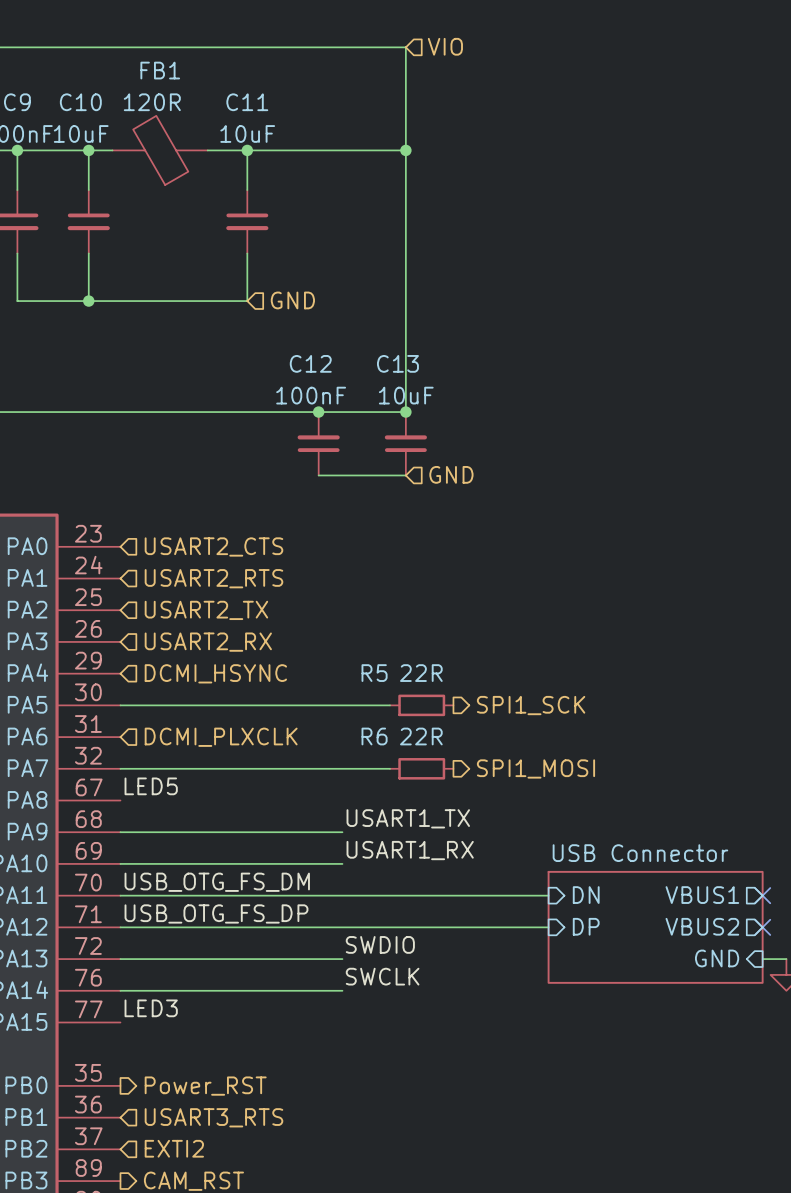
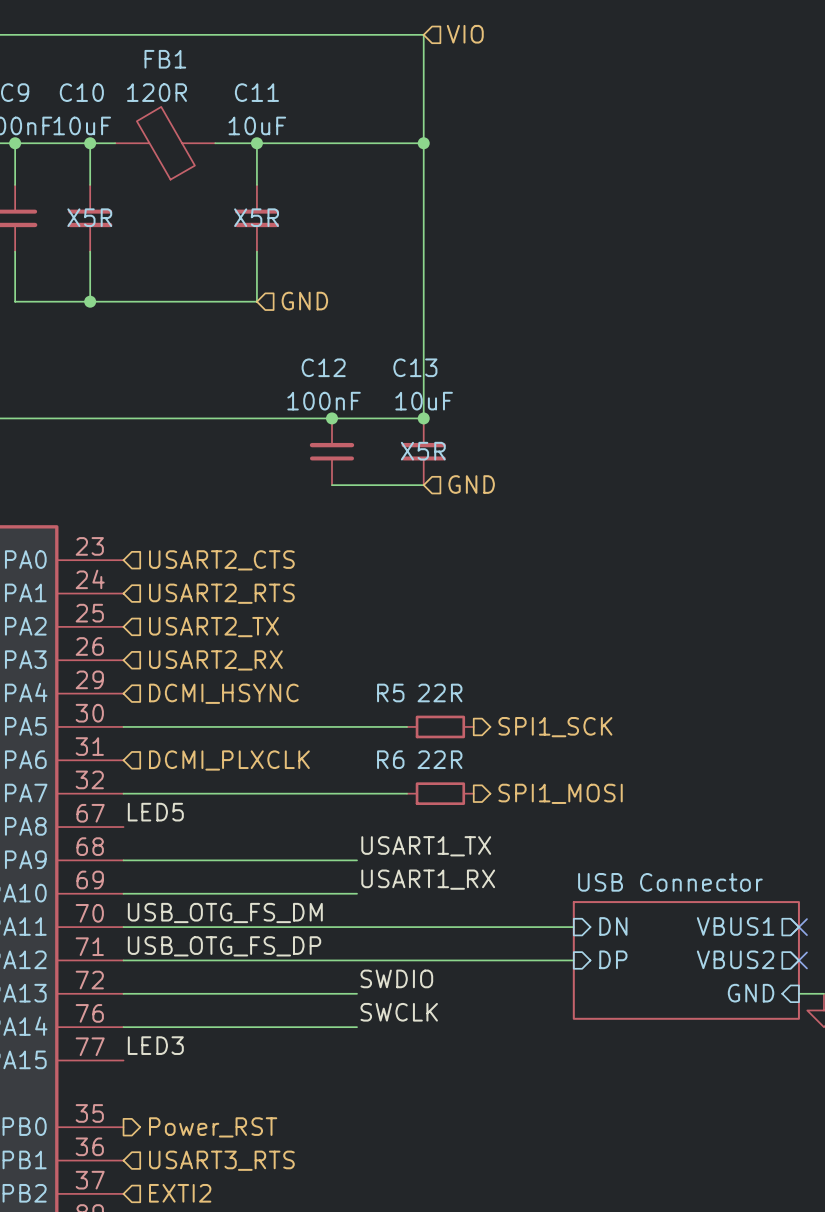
C10 text: none -> X5R (89, 217)
C11 text: none -> X5R (256, 217)
C13 text: none -> X5R (423, 451)

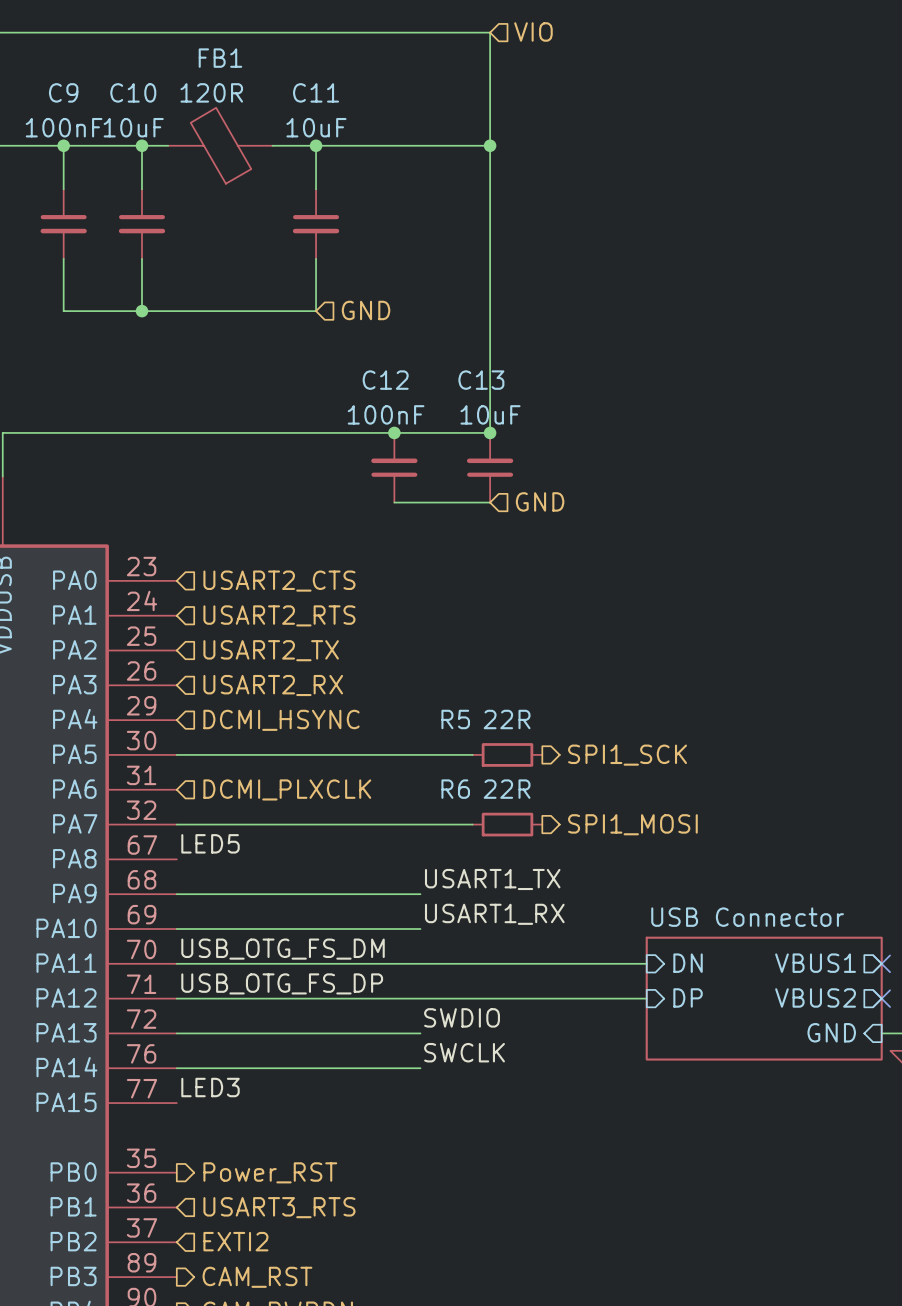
C10 text: X5R (89, 217) -> none
C11 text: X5R (256, 217) -> none
C13 text: X5R (423, 451) -> none

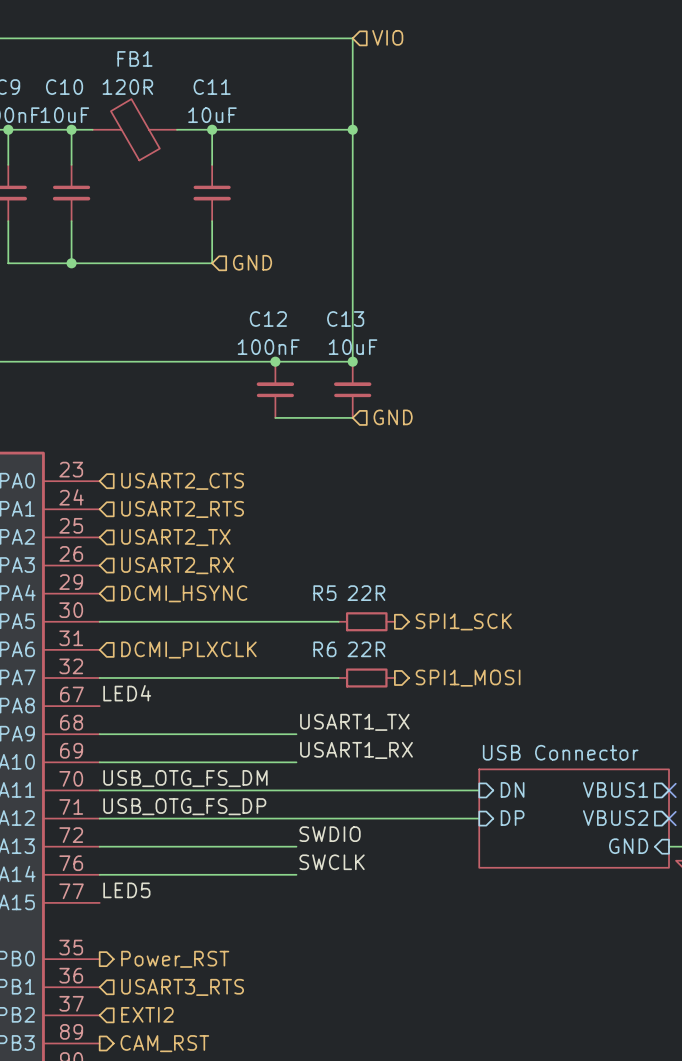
label: LED5 (210, 843) -> LED4 (127, 693)
label: LED3 (210, 1087) -> LED5 (126, 890)

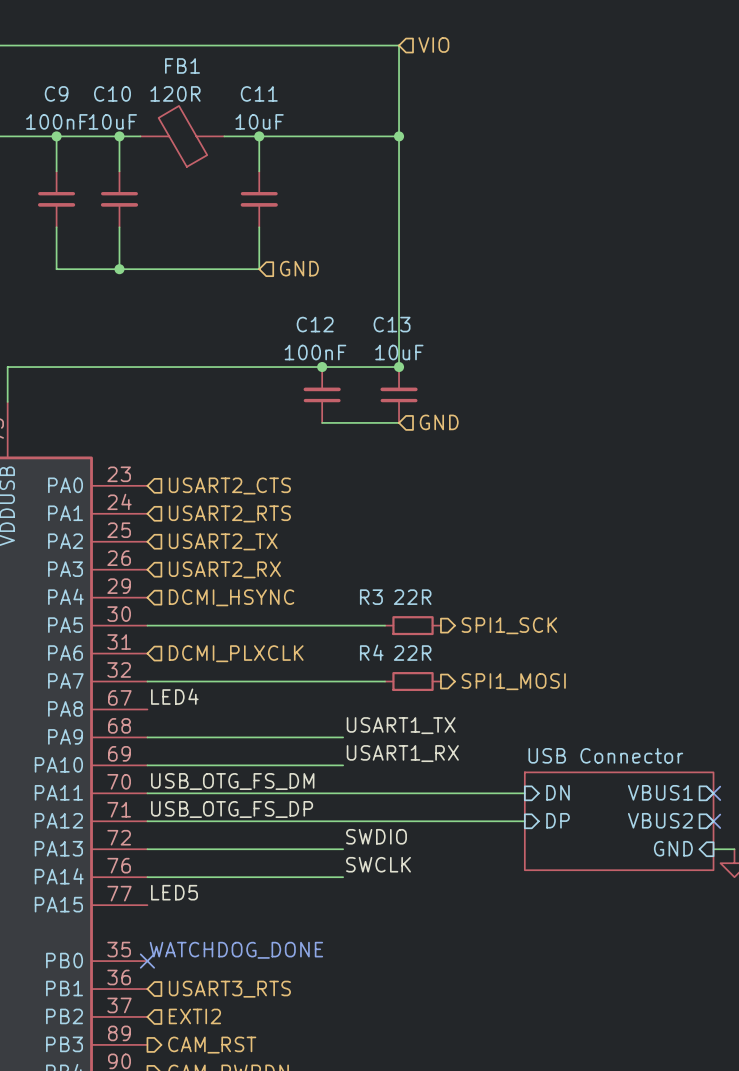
R5 name: R5 (324, 593) -> R3 (371, 597)
R6 name: R6 (324, 649) -> R4 (371, 652)
text: none -> WATCHDOG_DONE (236, 950)
no-connect mark: none -> (147, 961)
hierarchical label: Power_RST (175, 959) -> none

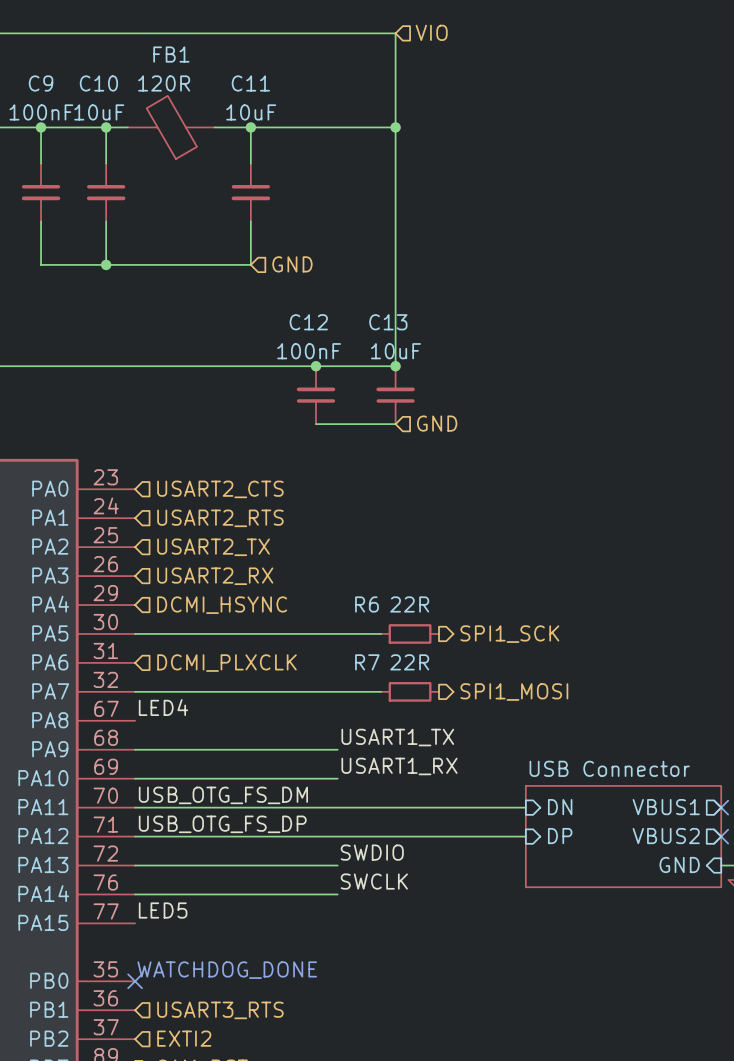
R3 name: R3 (371, 597) -> R6 (366, 604)
R4 name: R4 (371, 652) -> R7 (367, 662)

